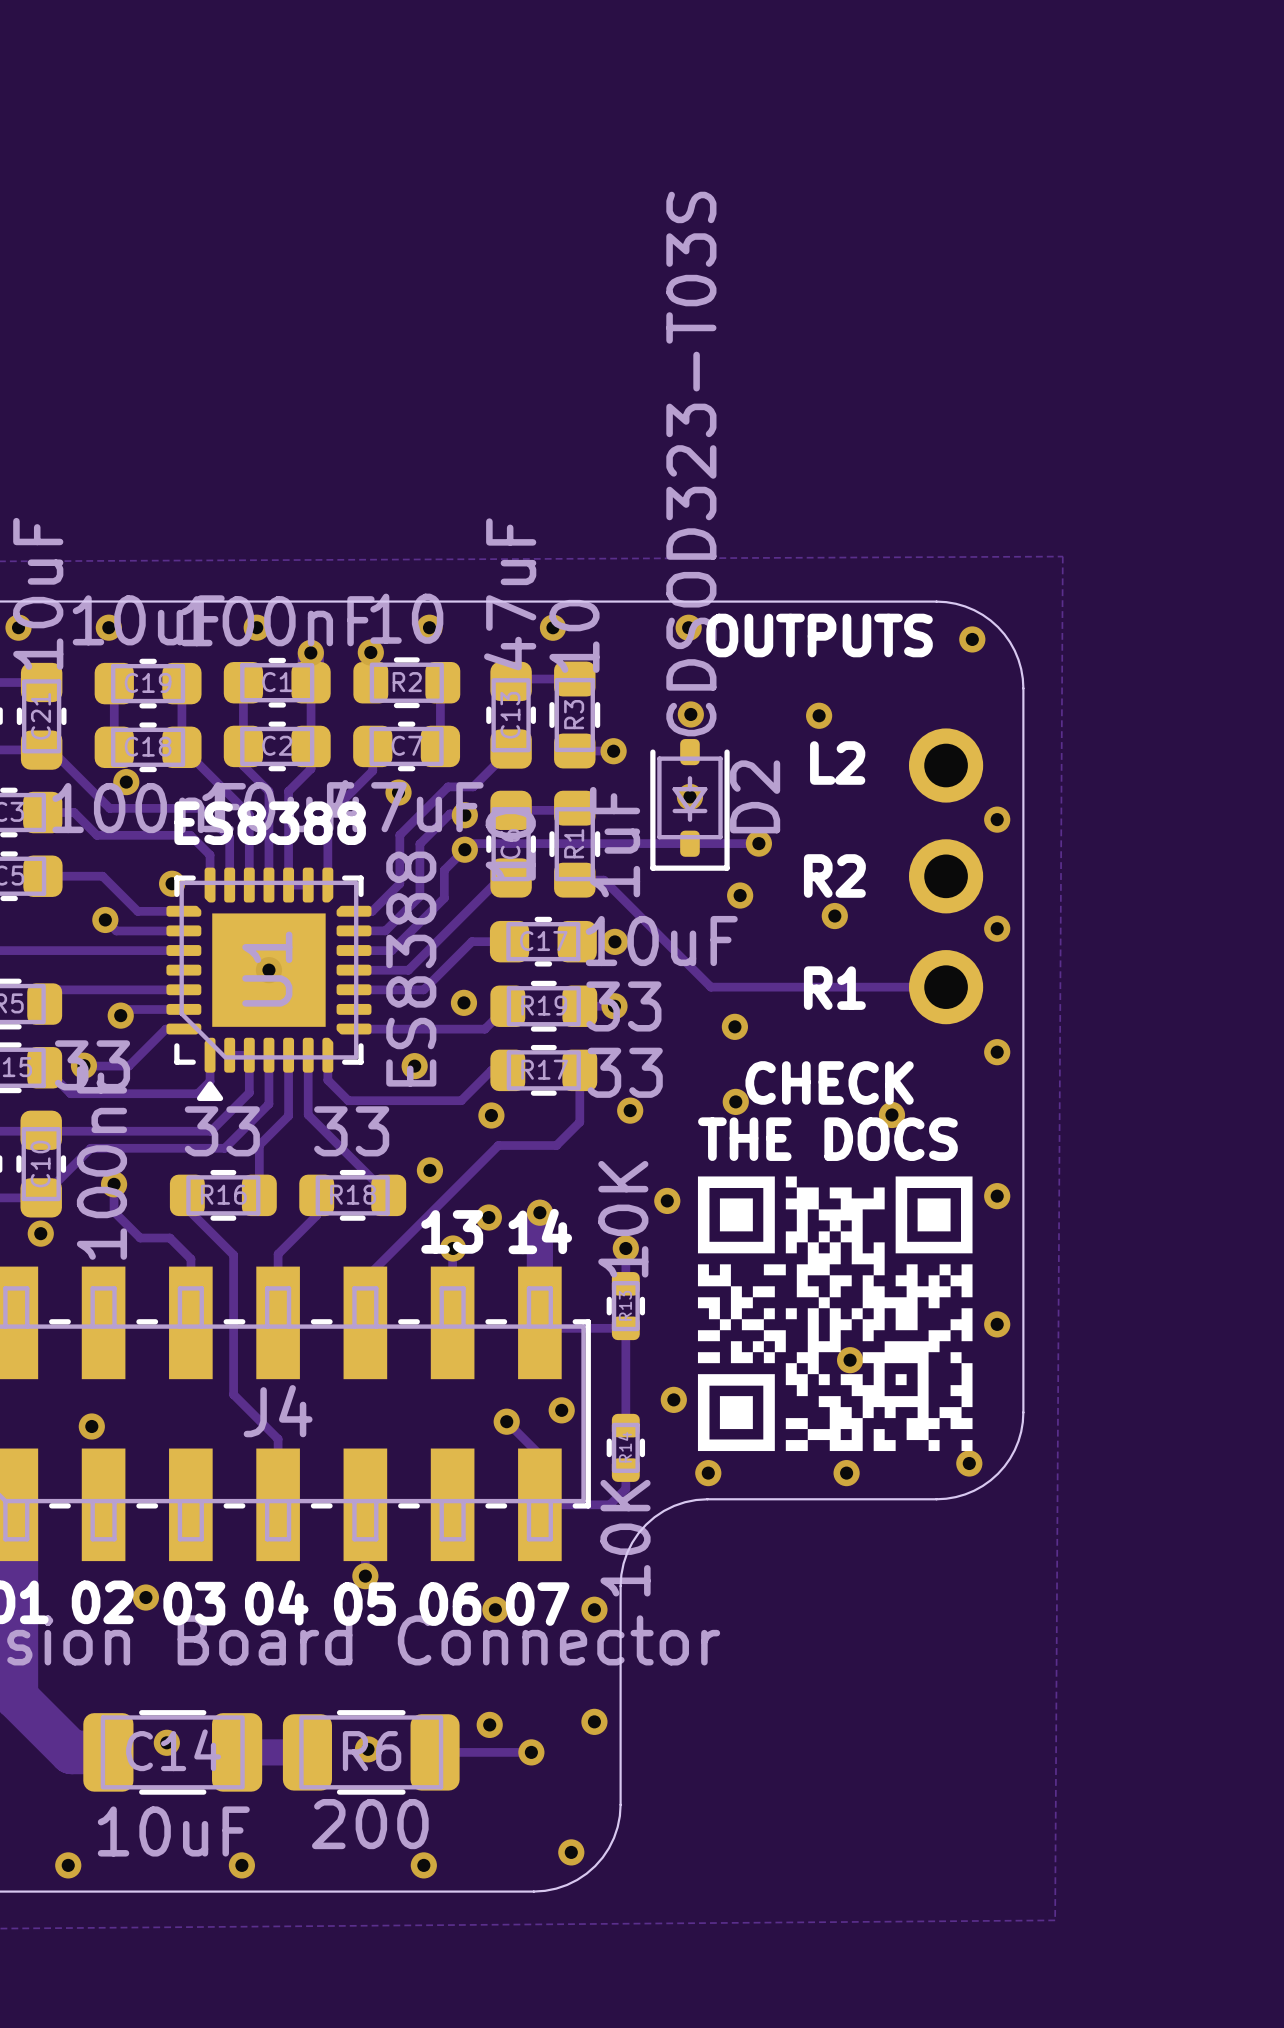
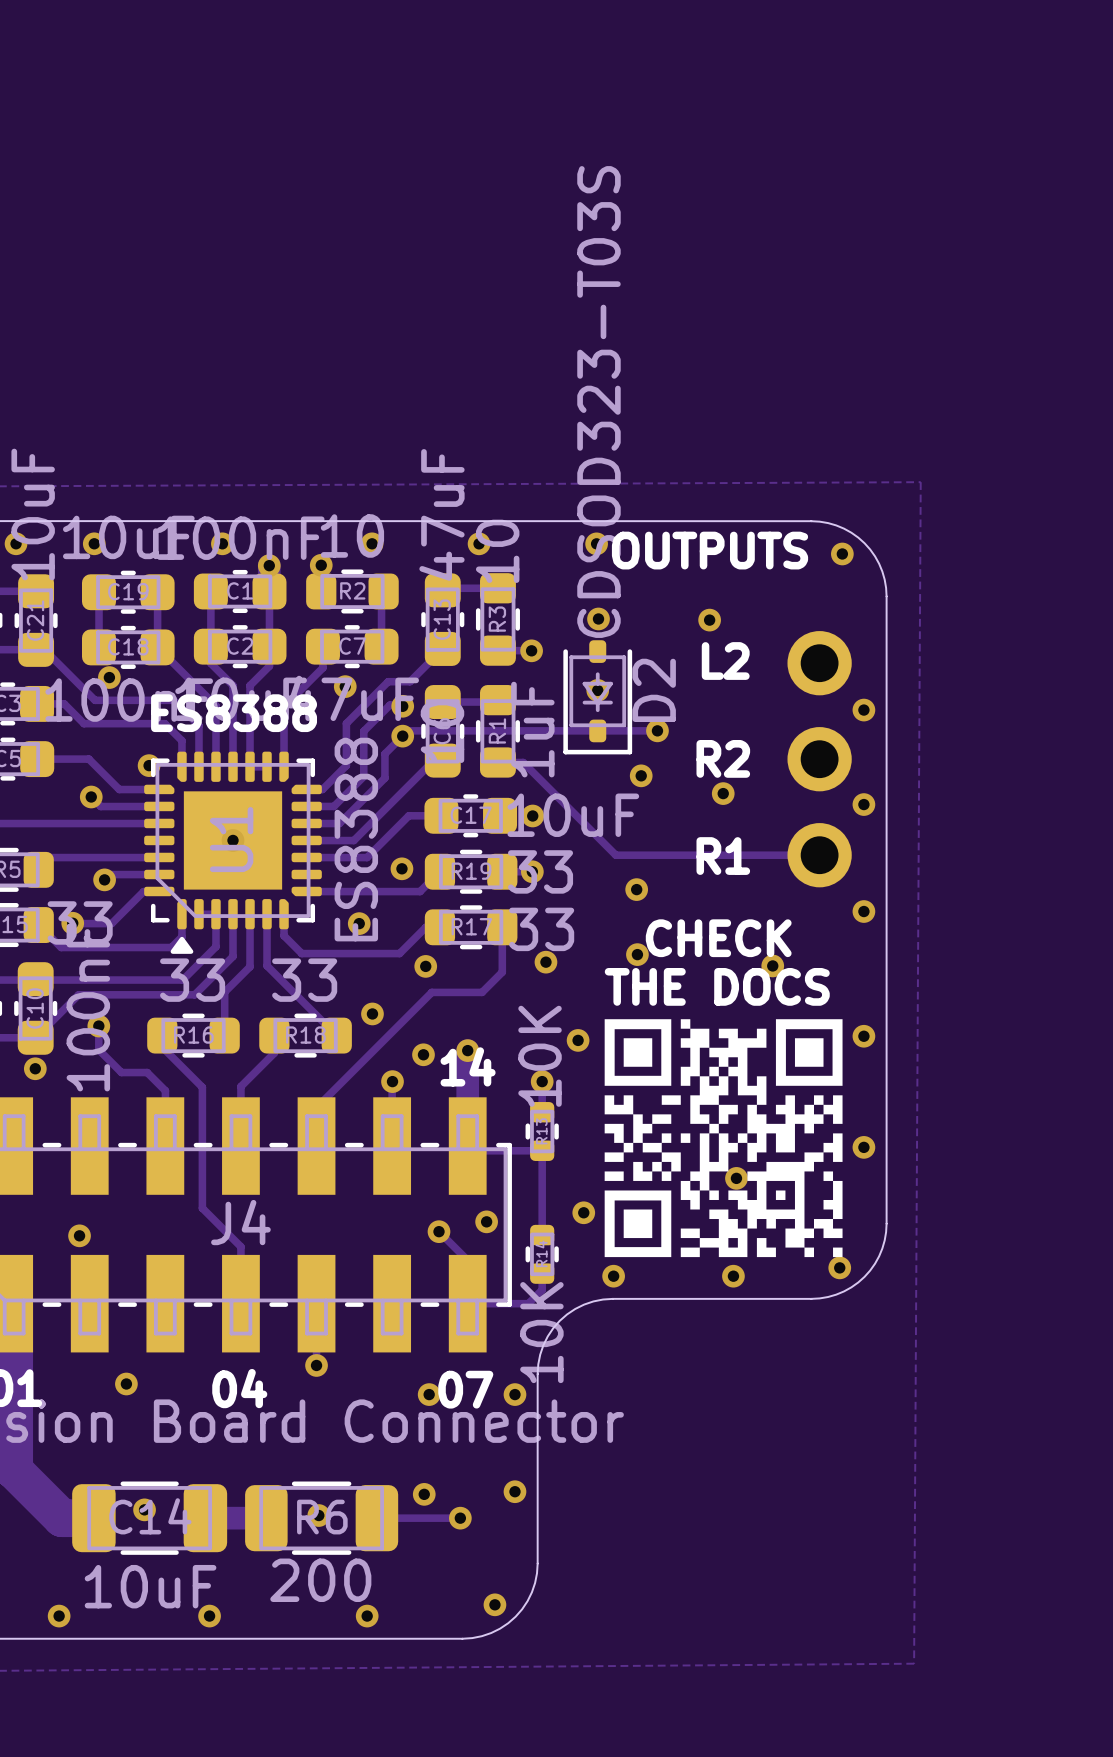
text: 13 (452, 1231) -> none
text: 02 (102, 1602) -> none
text: 03 (194, 1603) -> none
text: 05 (364, 1604) -> none
text: 06 (450, 1604) -> none

